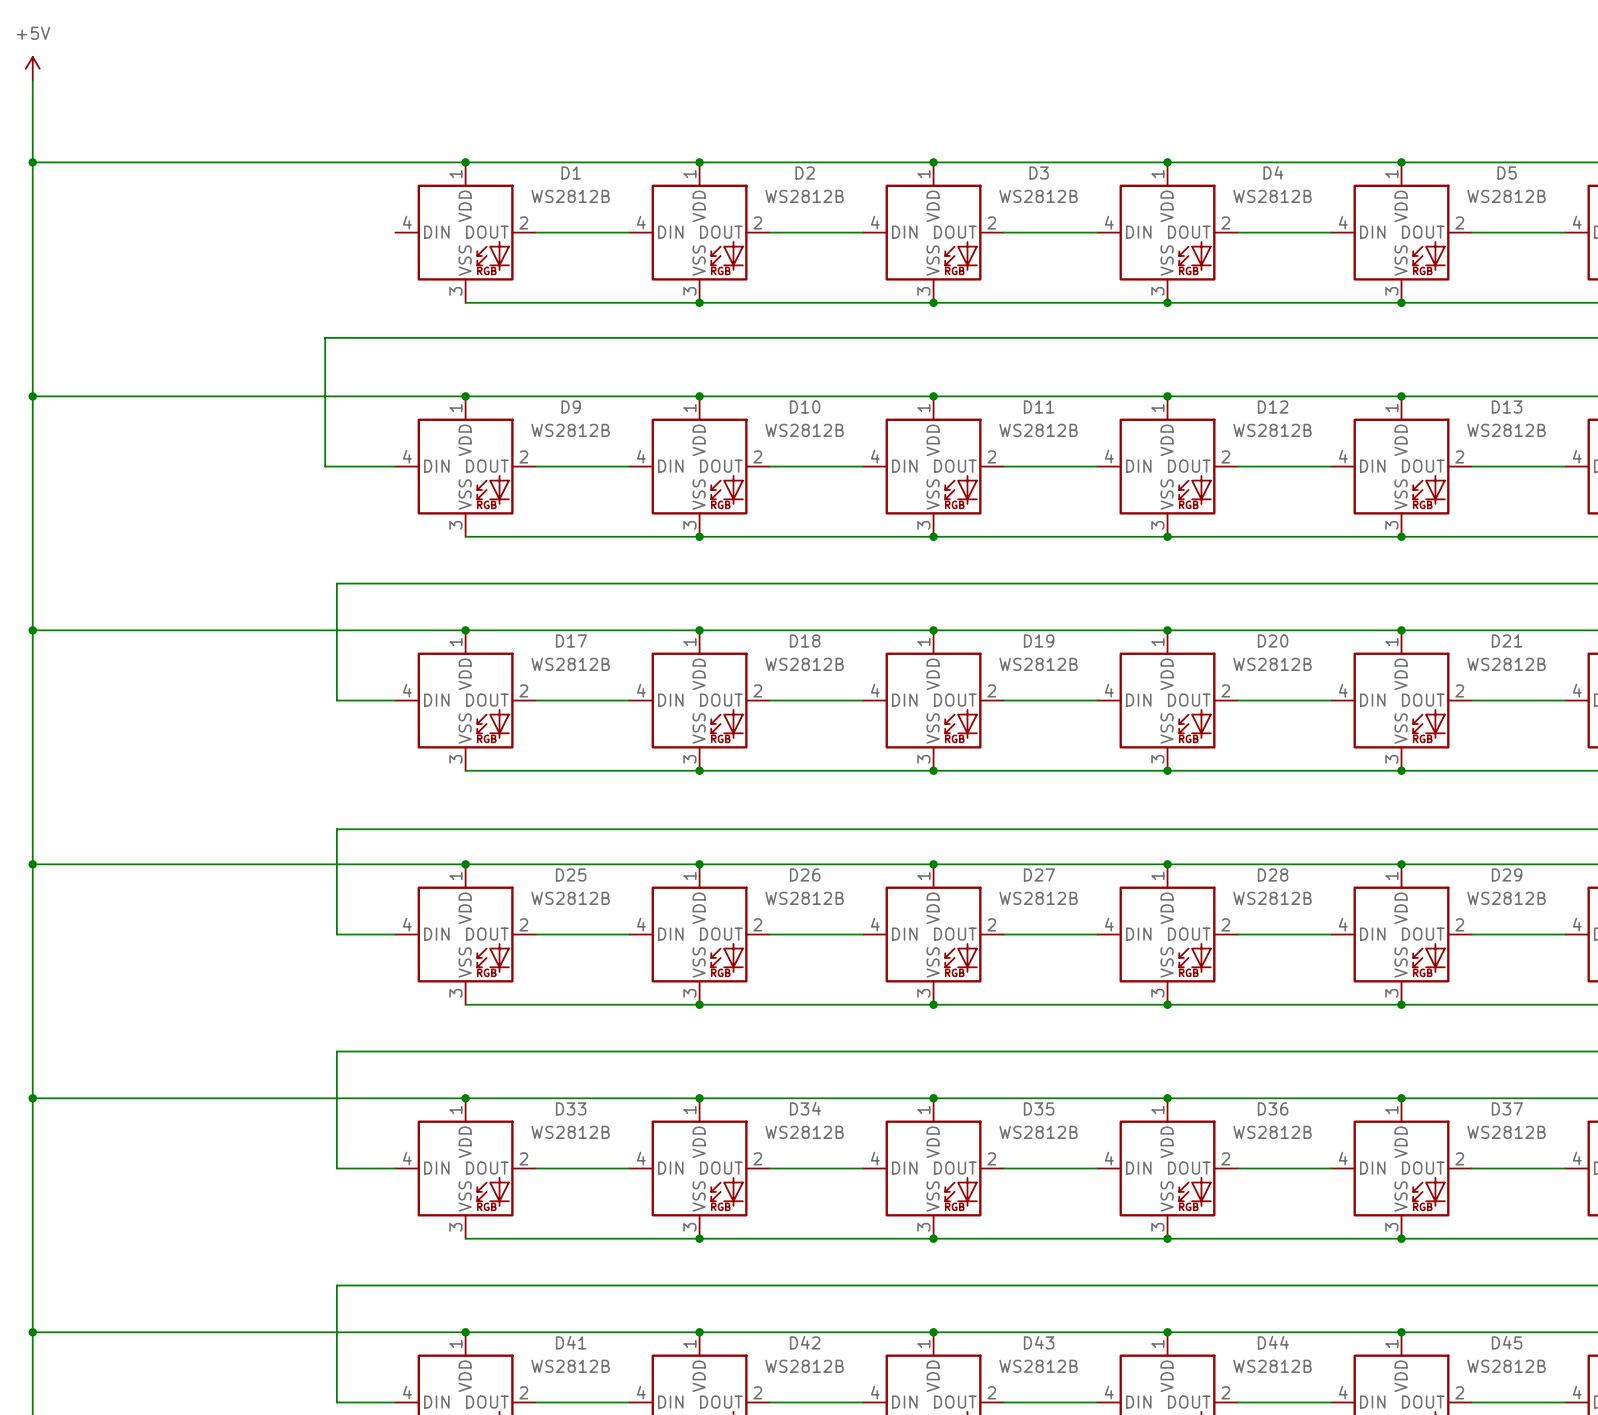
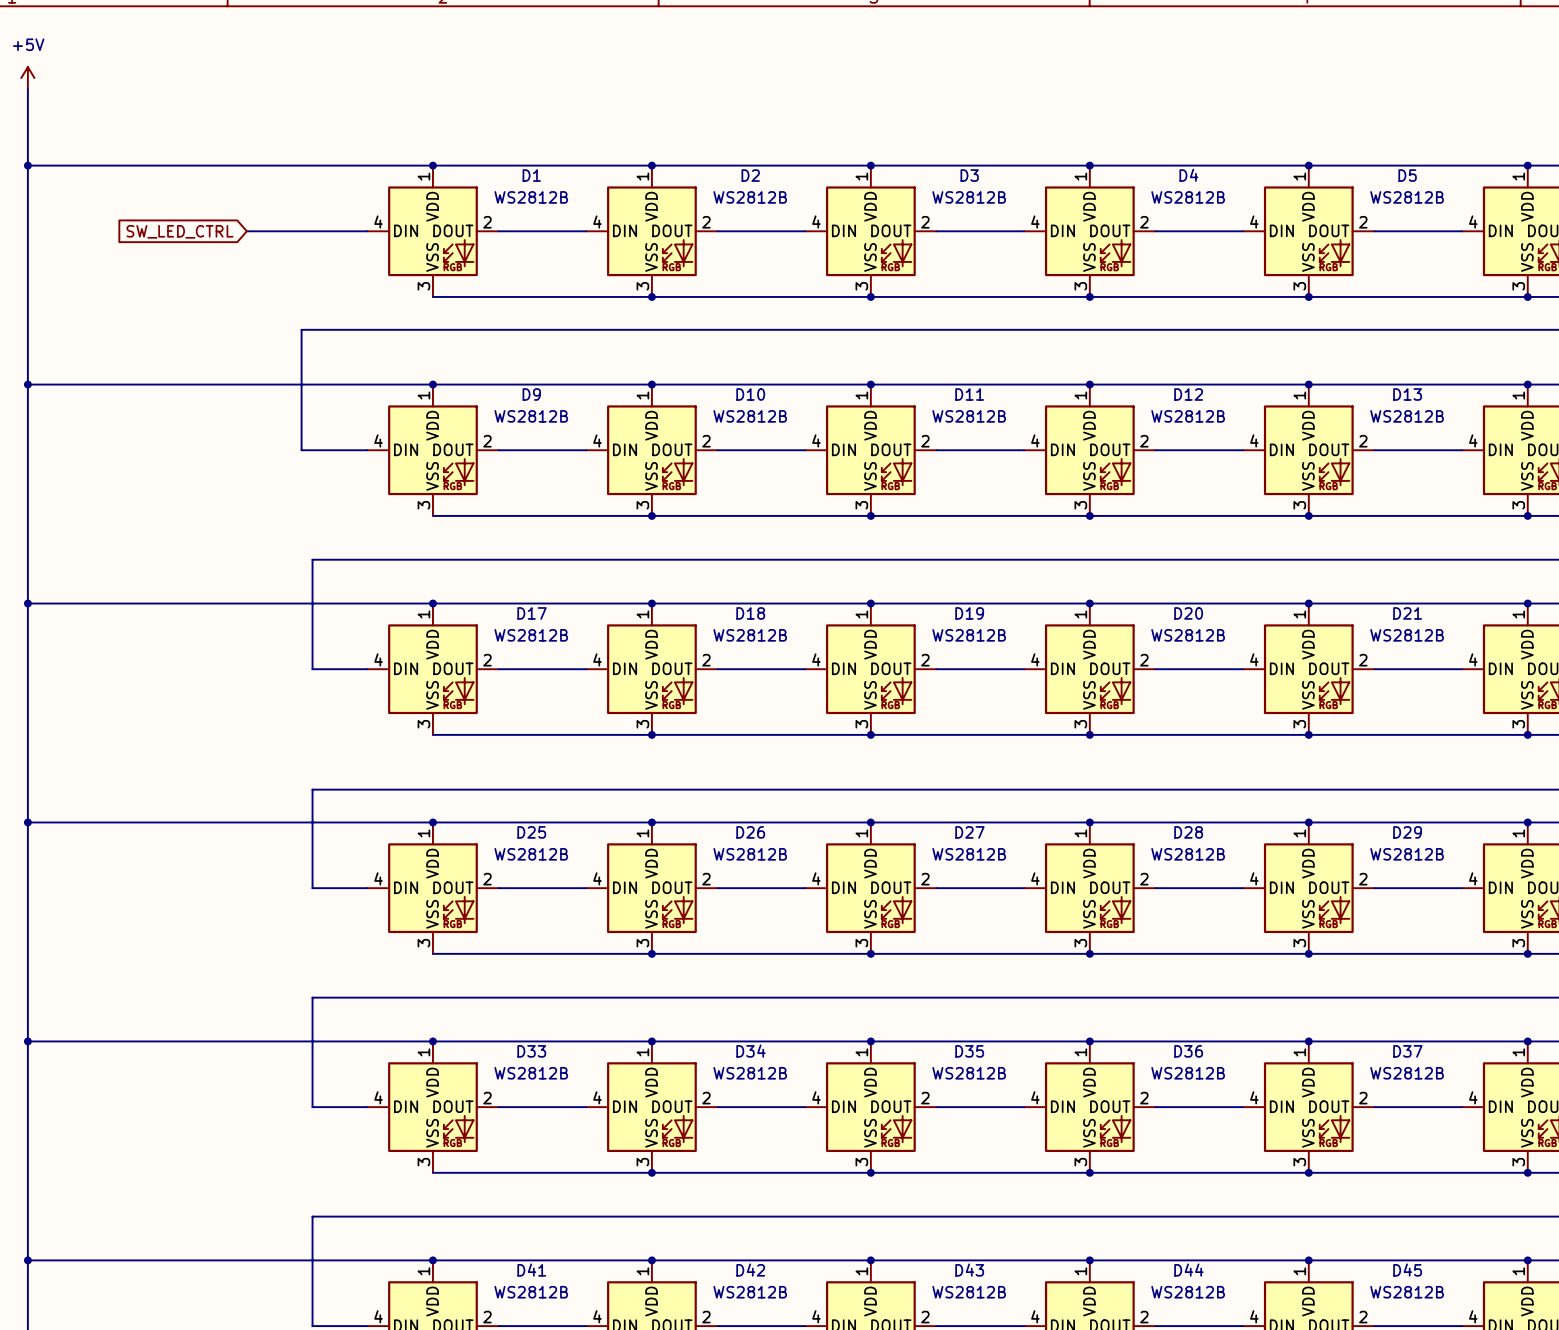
wire: none -> (246, 231) (367, 231)
global label: none -> SW_LED_CTRL (179, 231)

